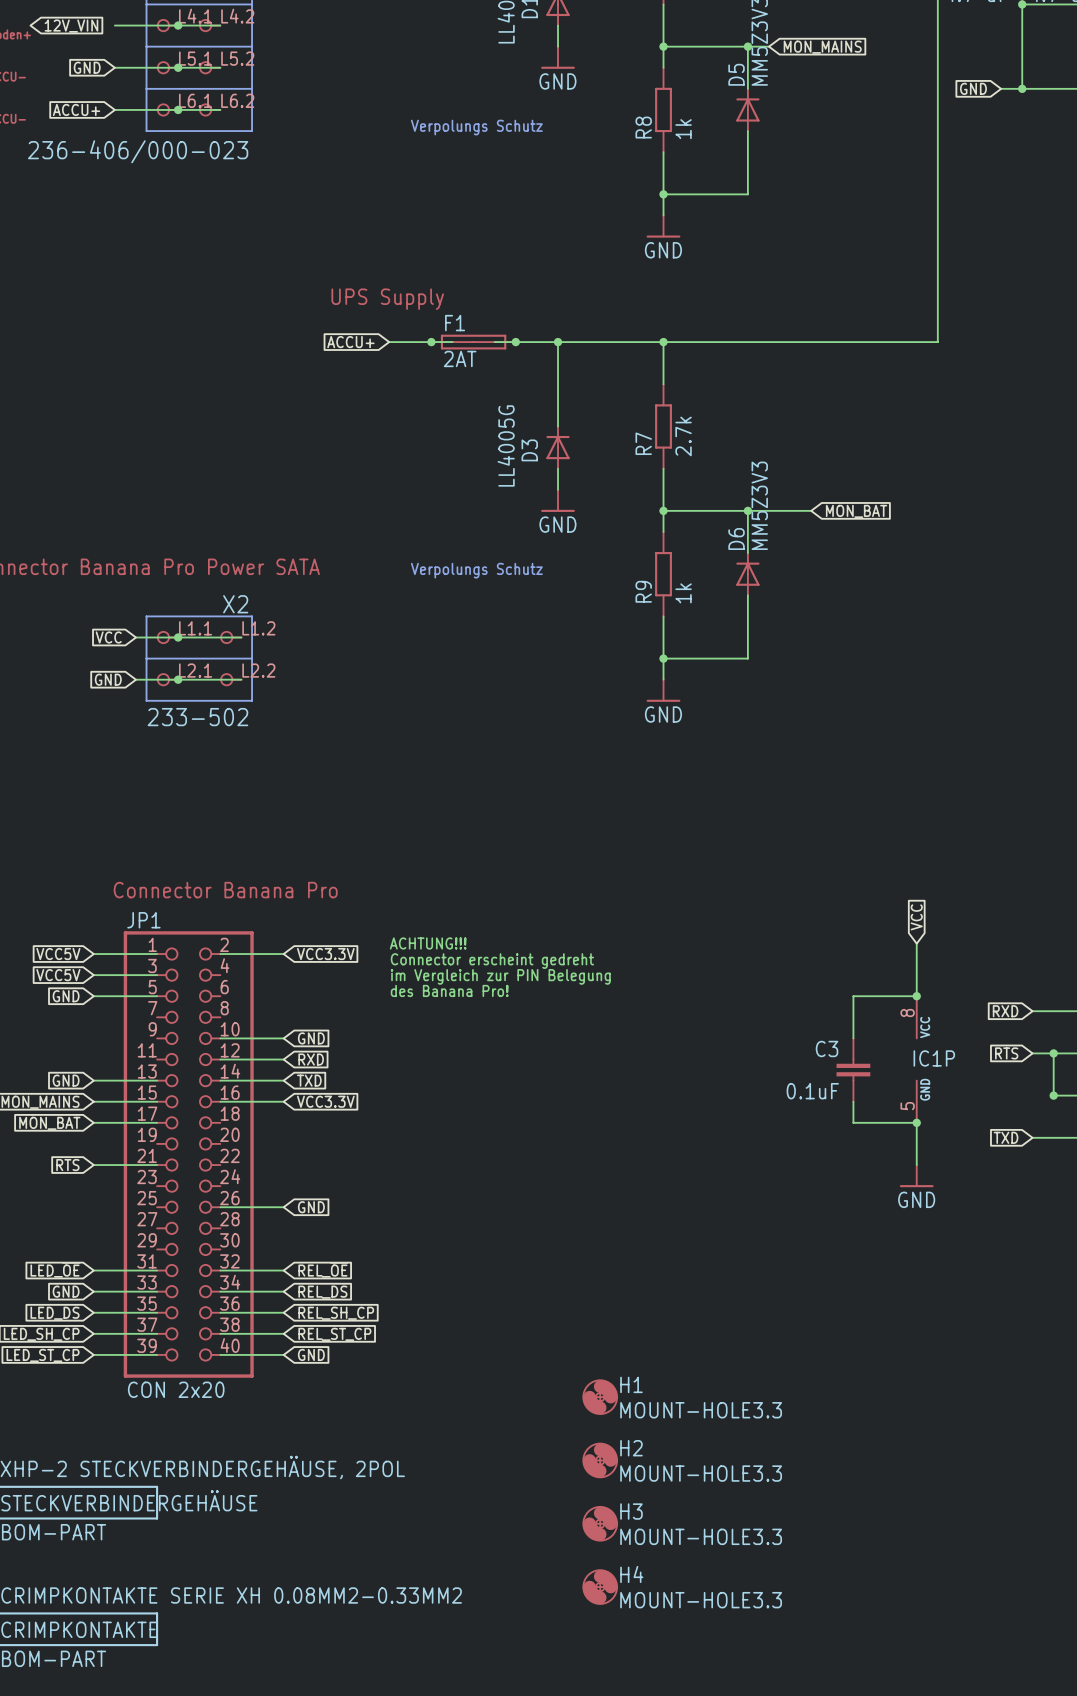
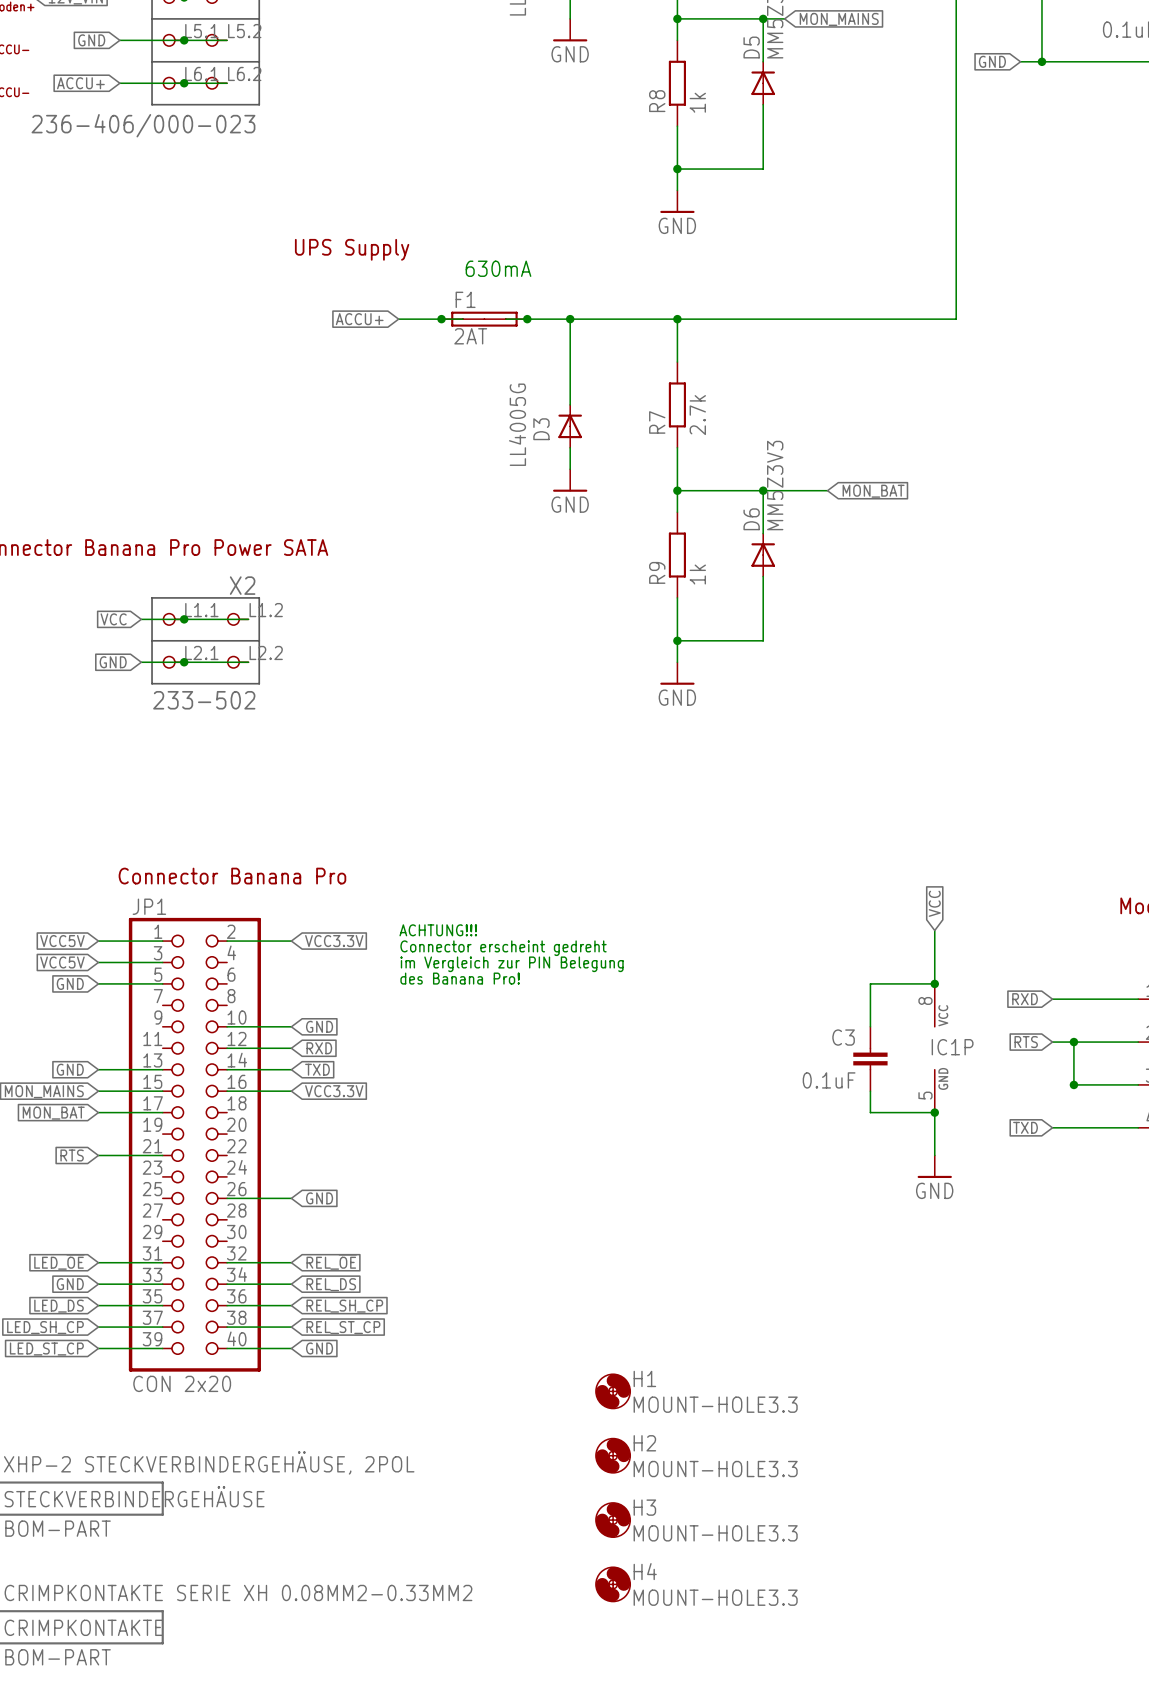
text: Verpolungs Schutz (476, 127) -> none
text: none -> 630mA (498, 268)
text position: UPS Supply (387, 299) -> UPS Supply (352, 249)
text: Verpolungs Schutz (476, 570) -> none

